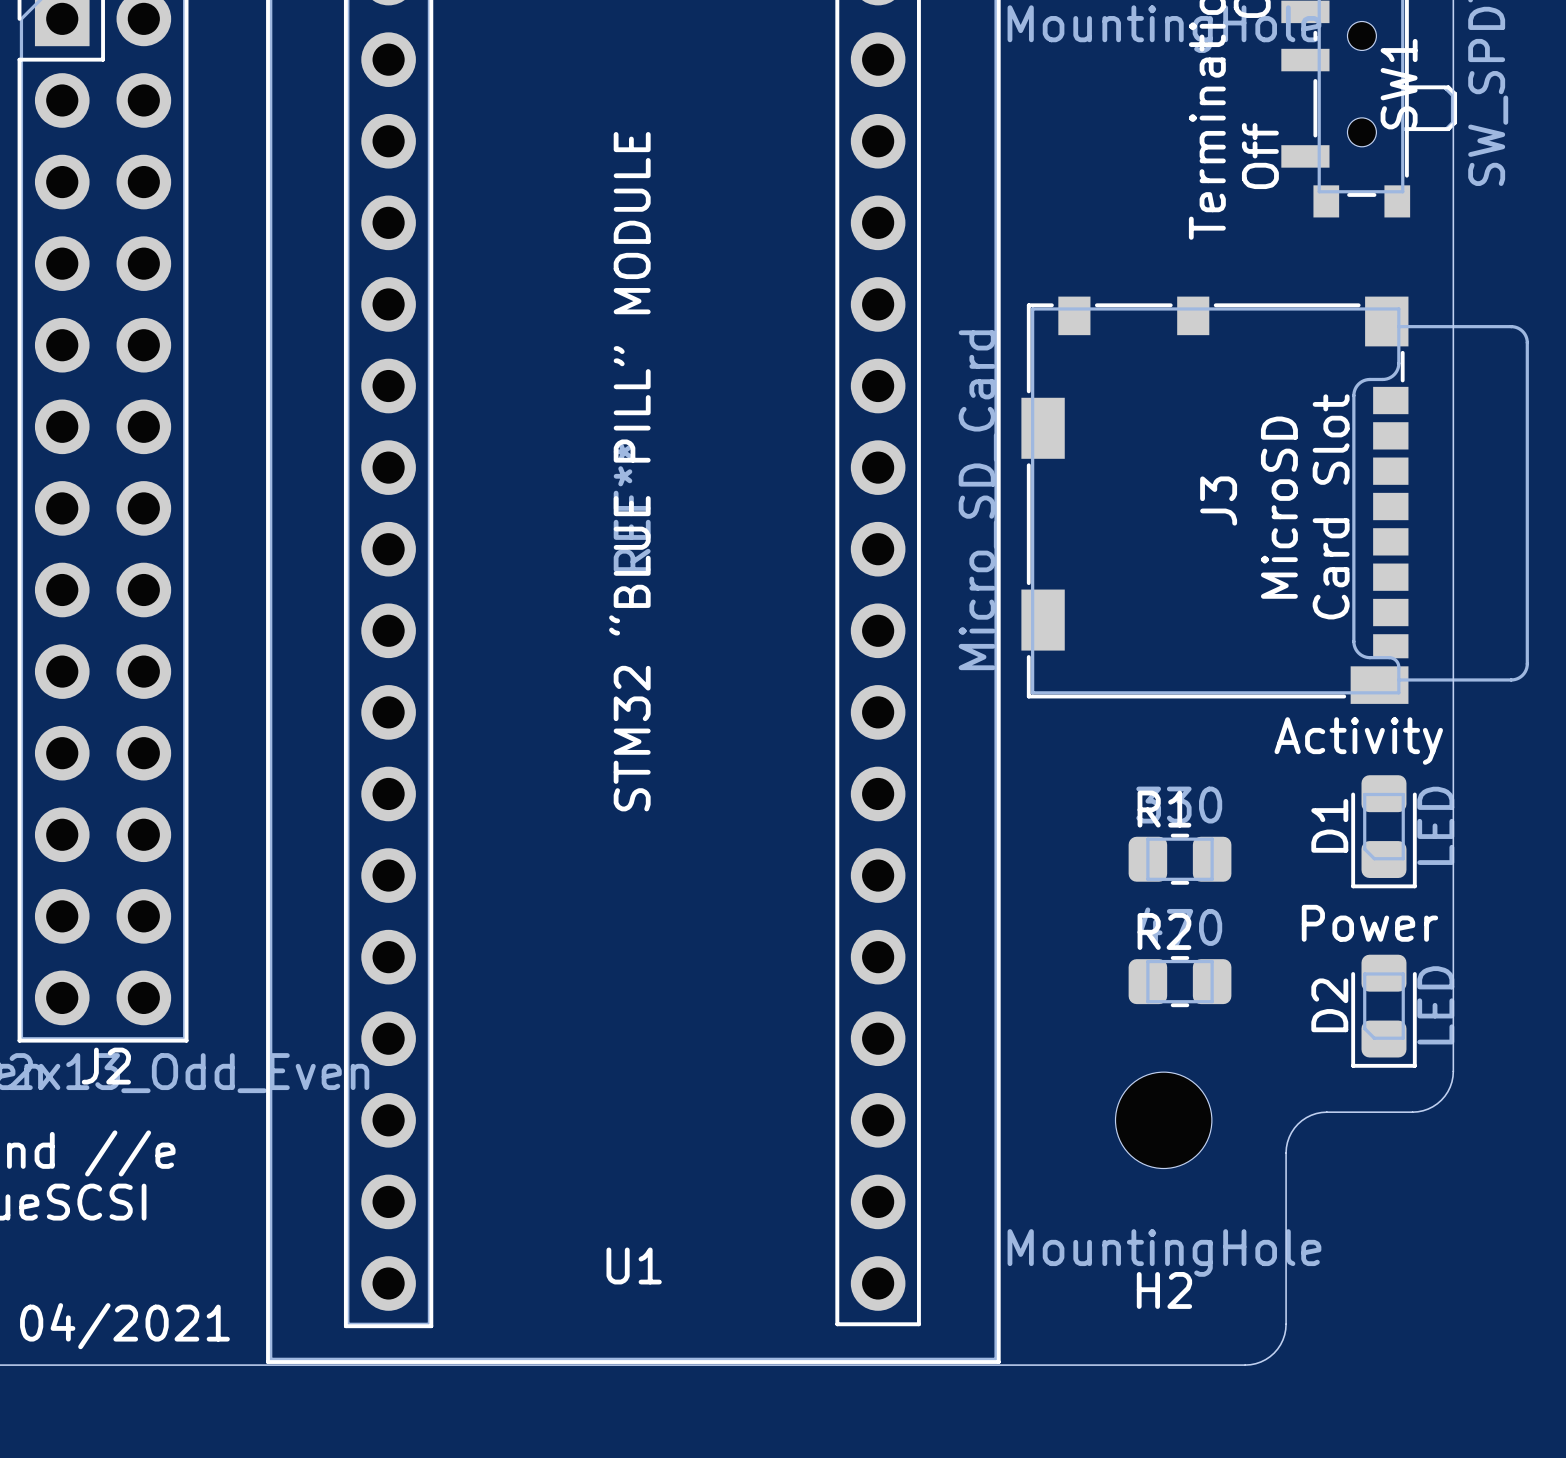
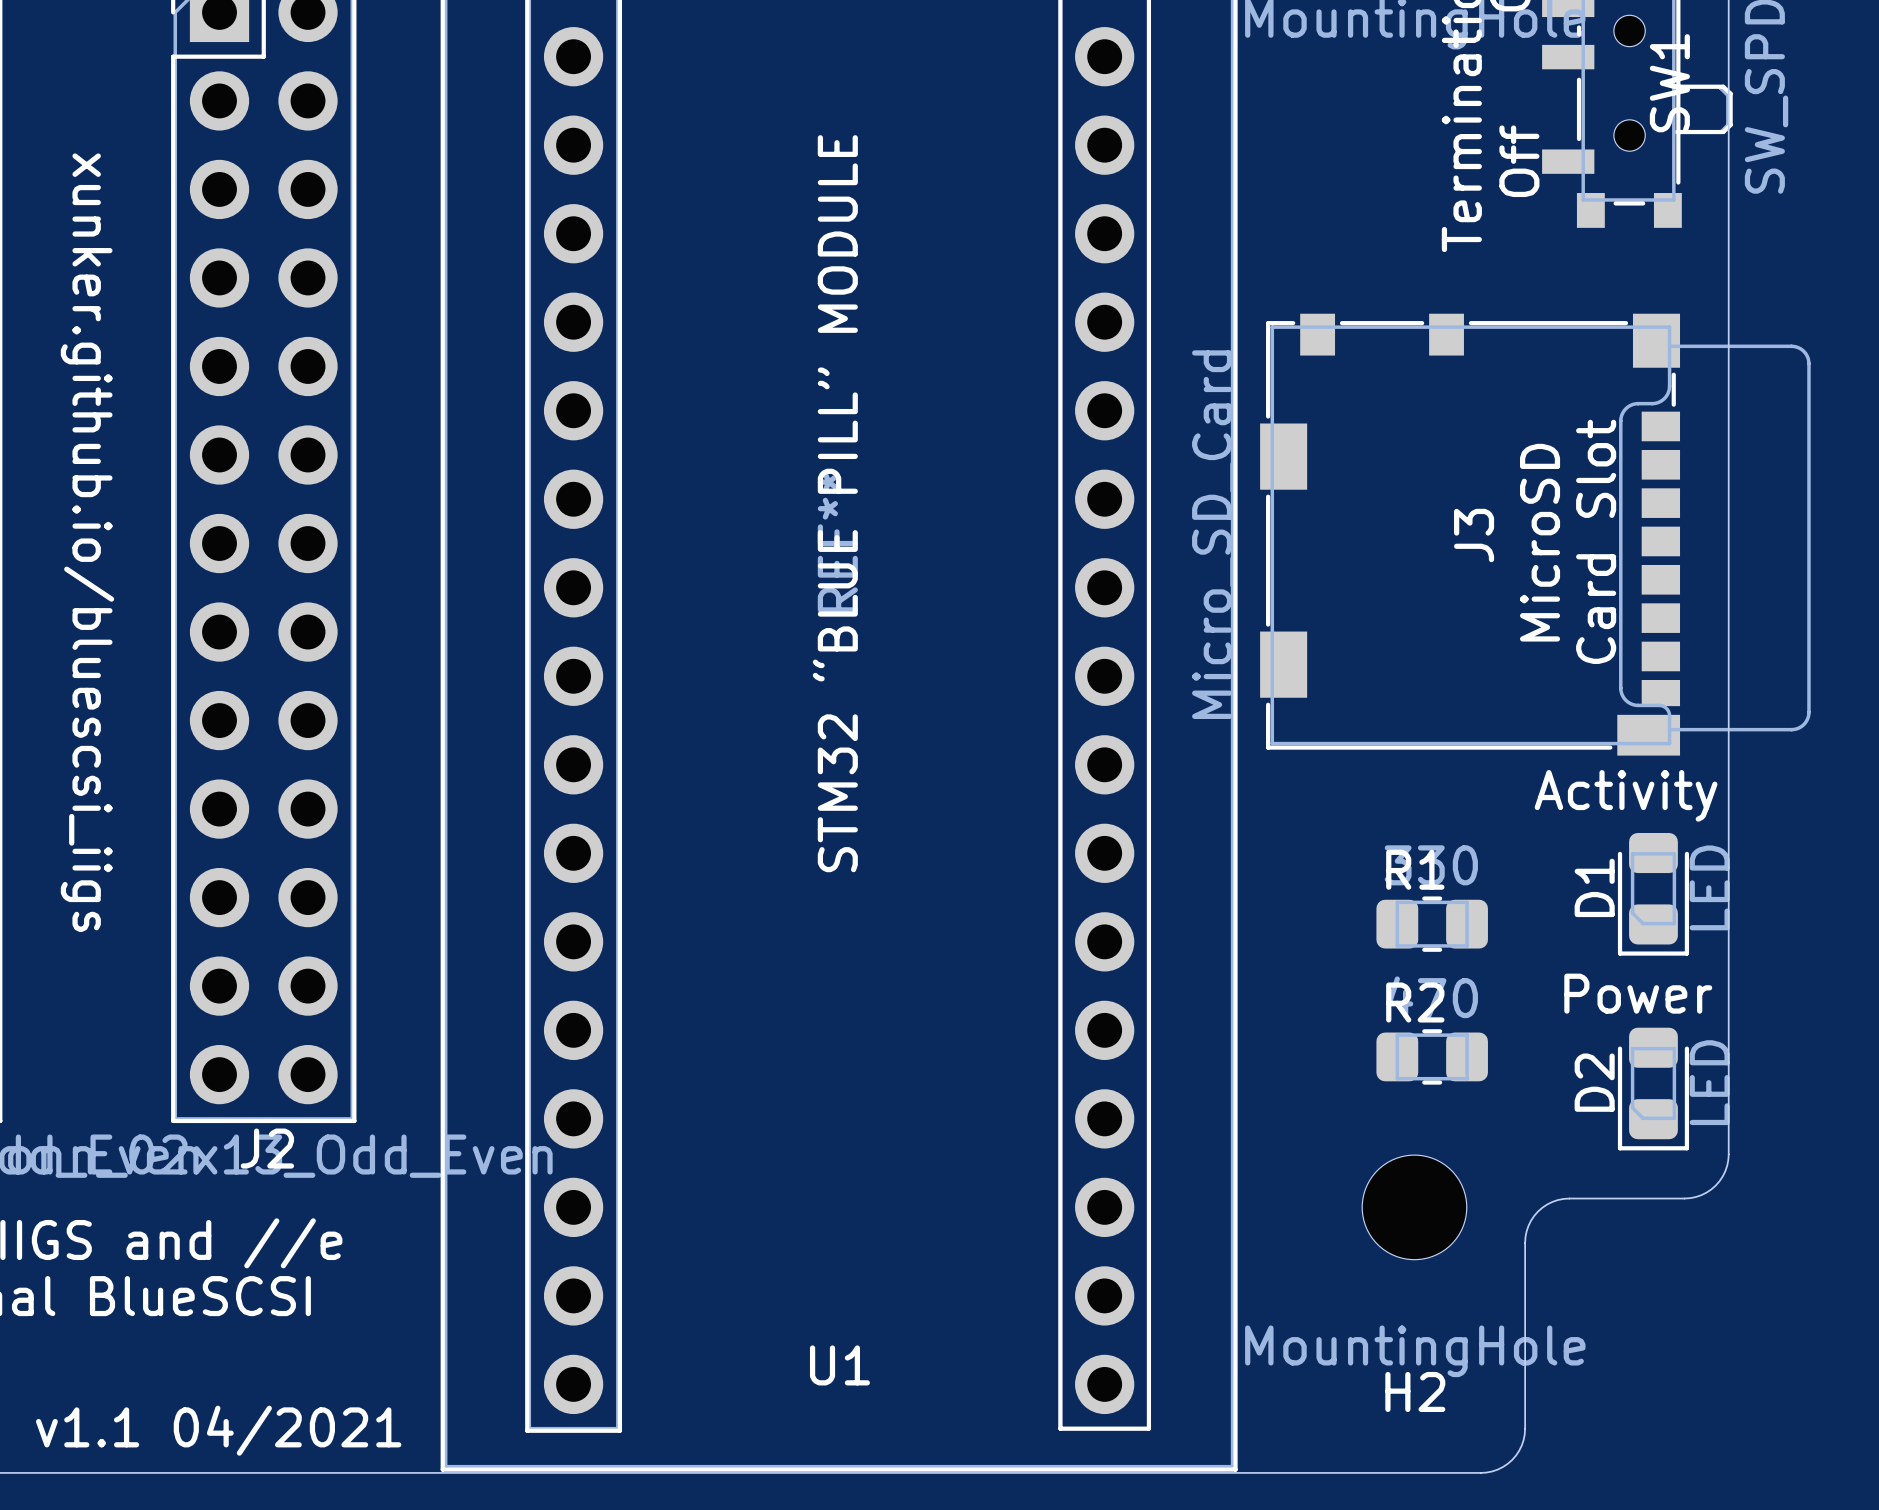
board edge: (1326, 1112) (1311, 1115) (1298, 1124) (1289, 1137) (1286, 1147) (1286, 1324) (1282, 1339) (1274, 1353) (1260, 1361) (1250, 1364) (1224, 1365) -> (1591, 1198) (1563, 1198) (1547, 1204) (1538, 1211) (1531, 1220) (1526, 1231) (1525, 1242)
board edge: none -> (1525, 1242) (1525, 1428)
board edge: none -> (1525, 1428) (1521, 1445) (1512, 1459) (1497, 1469) (1480, 1472)

